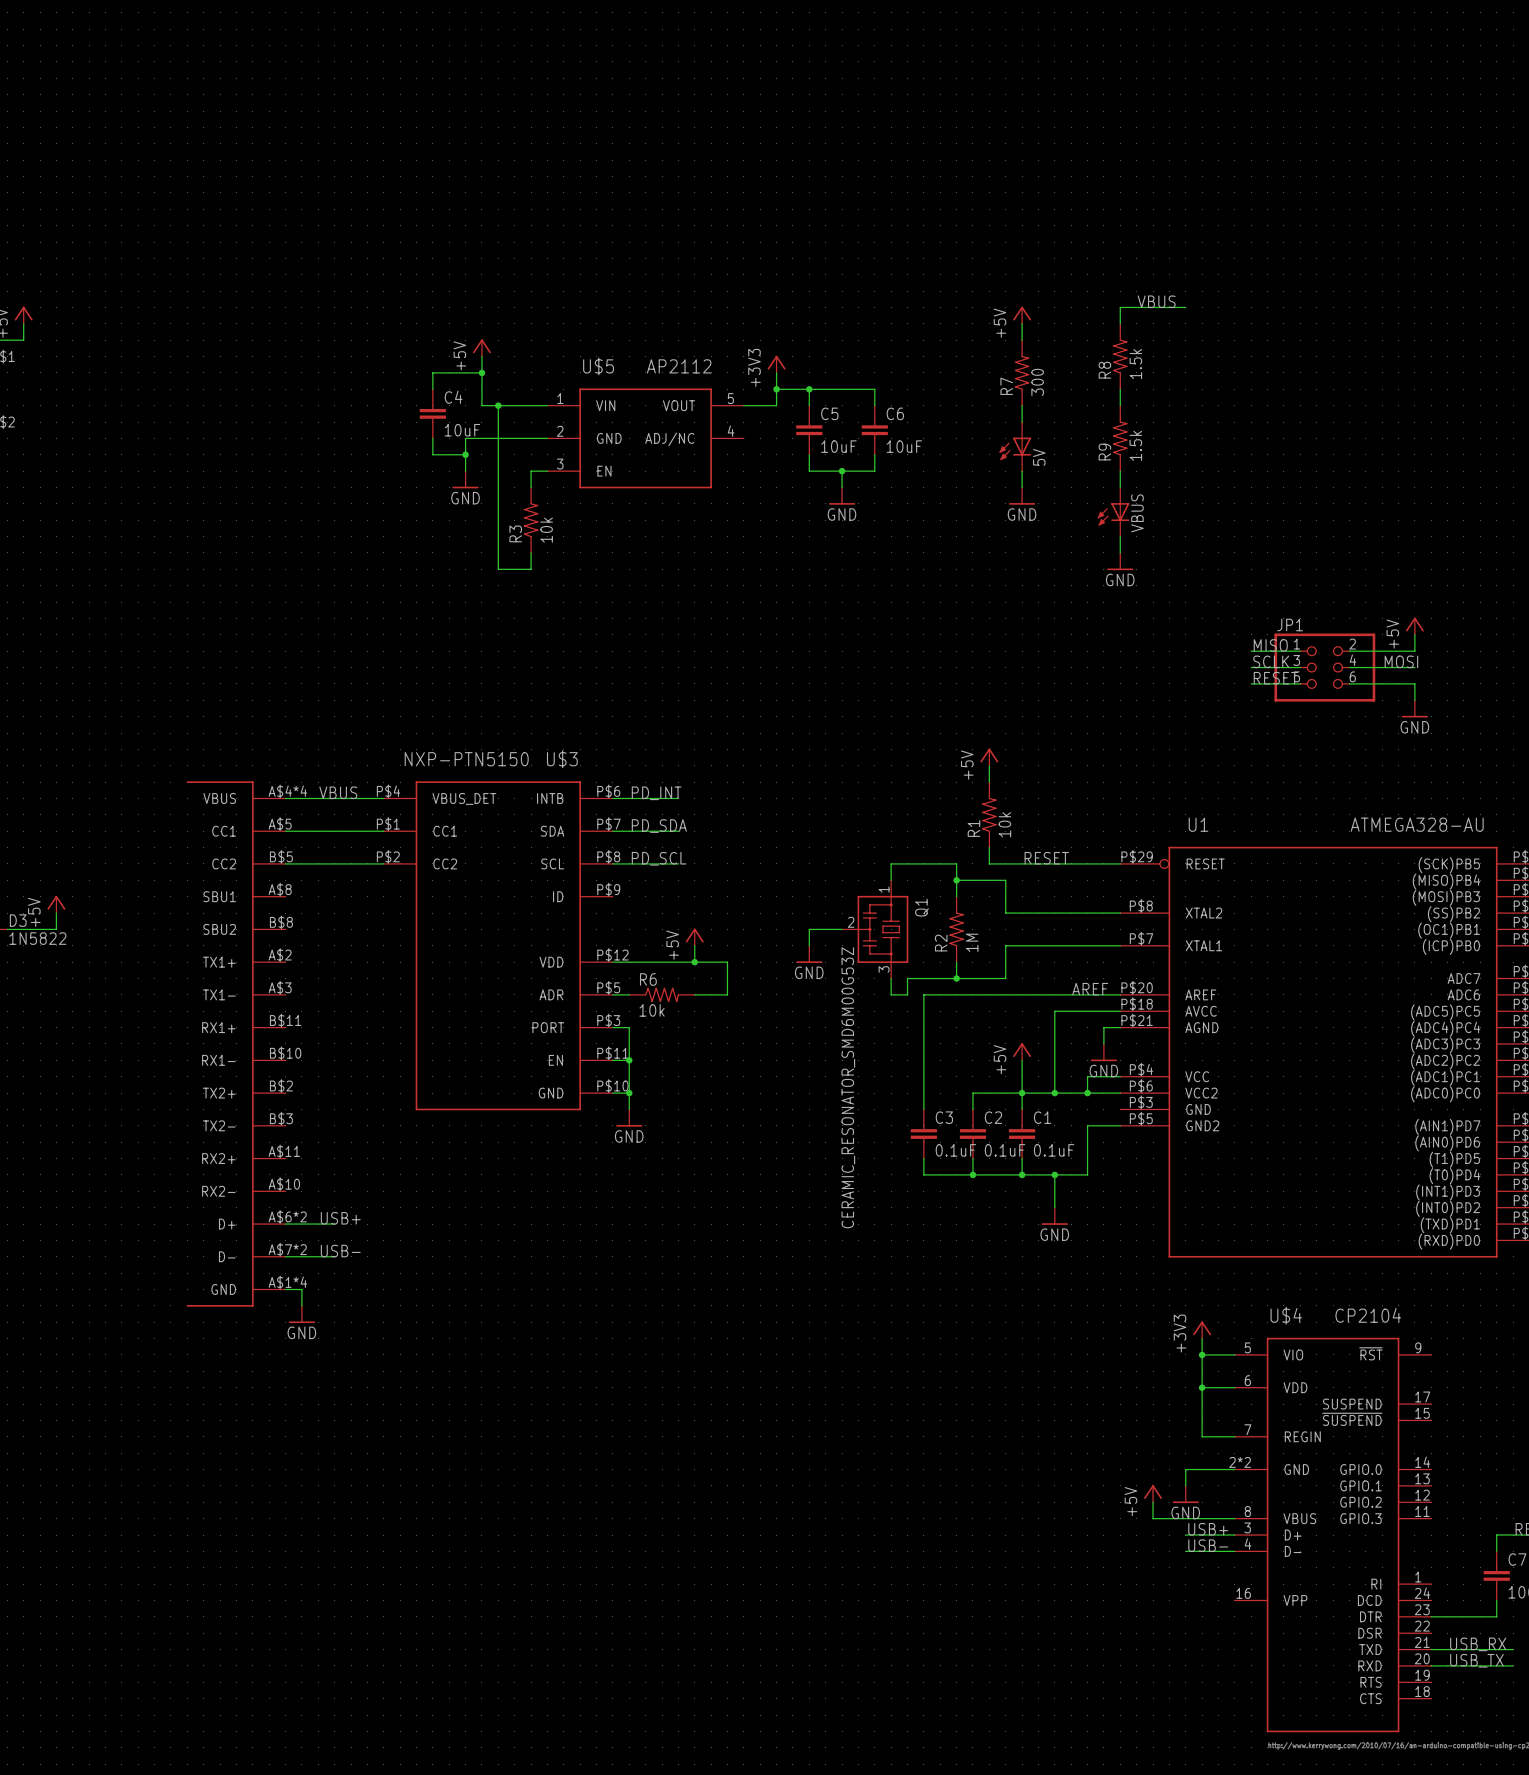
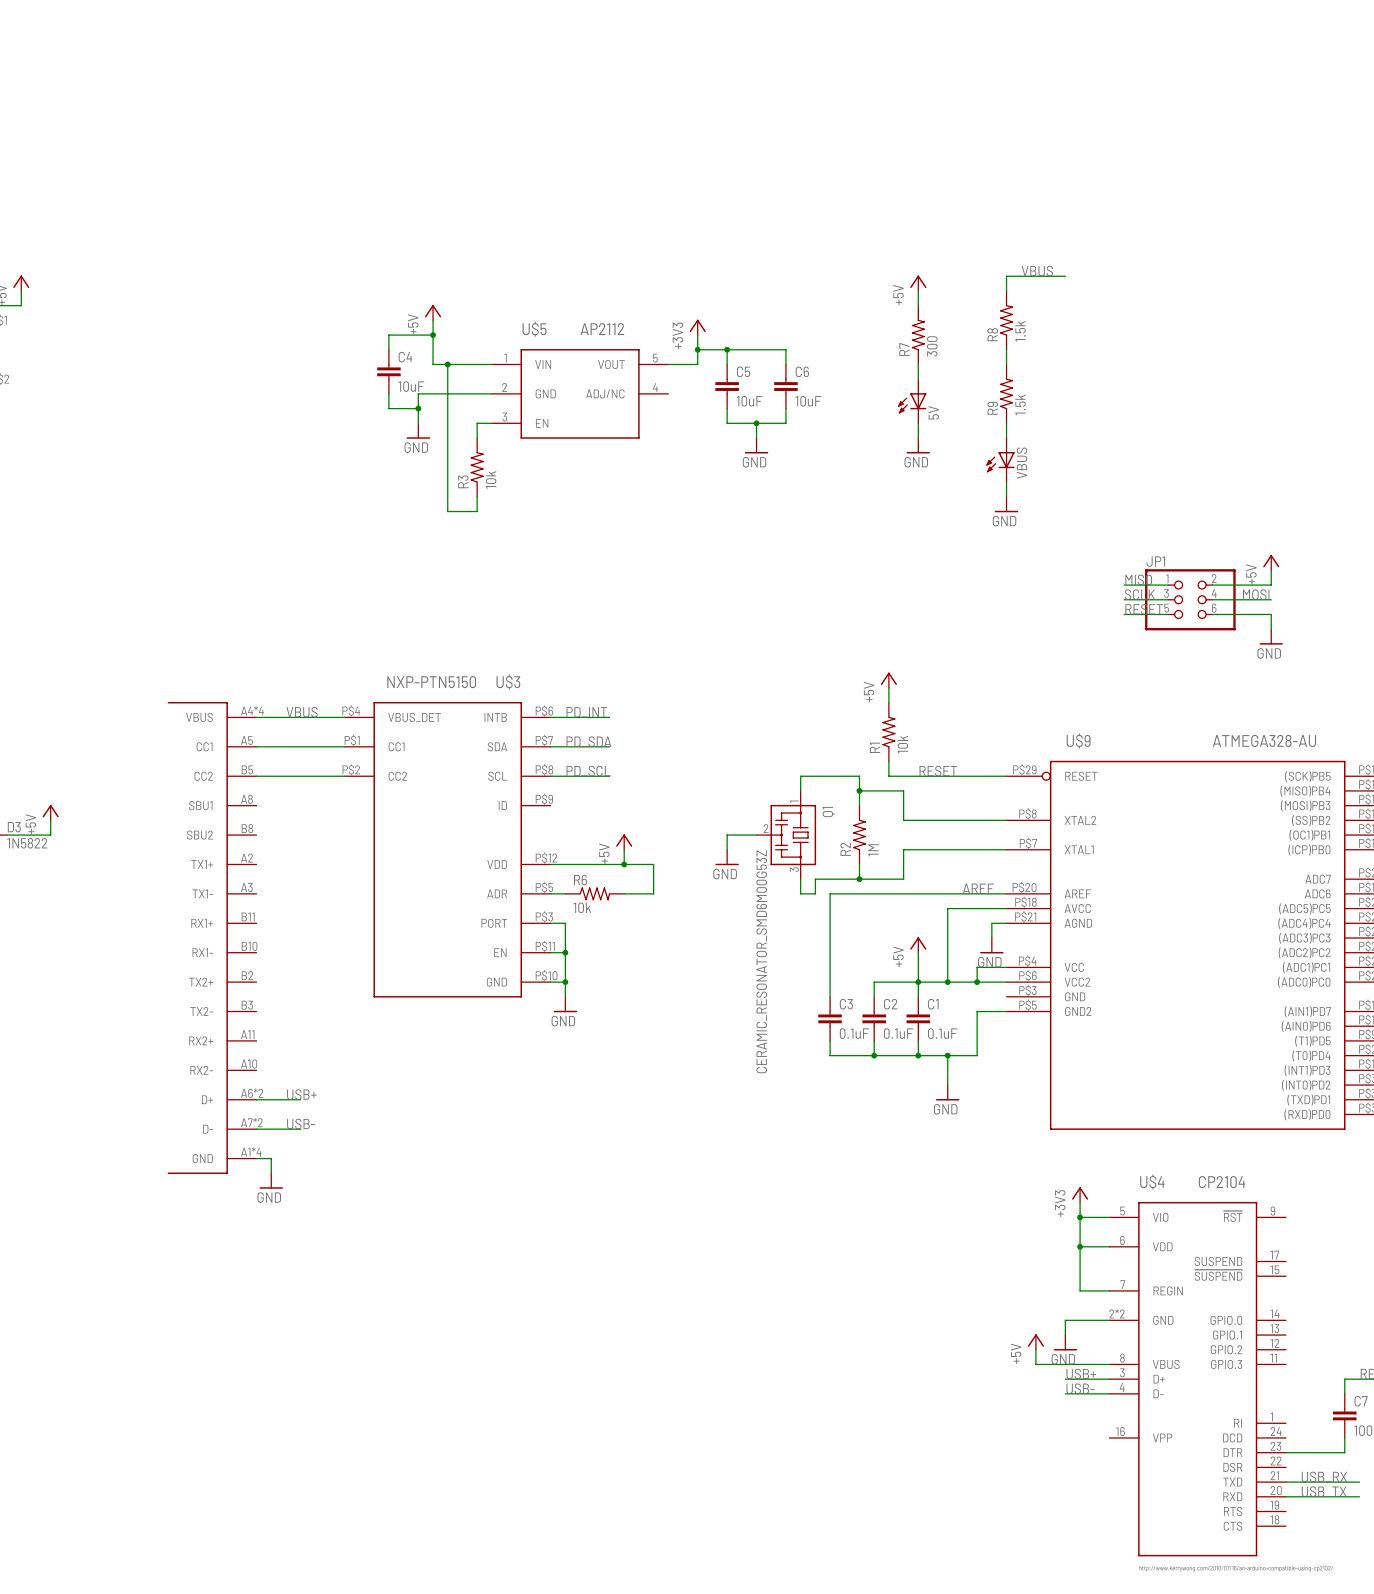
part symbol: [186, 781, 286, 1307] -> [167, 701, 257, 1175]
U1 name: U1 (1198, 824) -> U$9 (1078, 740)

